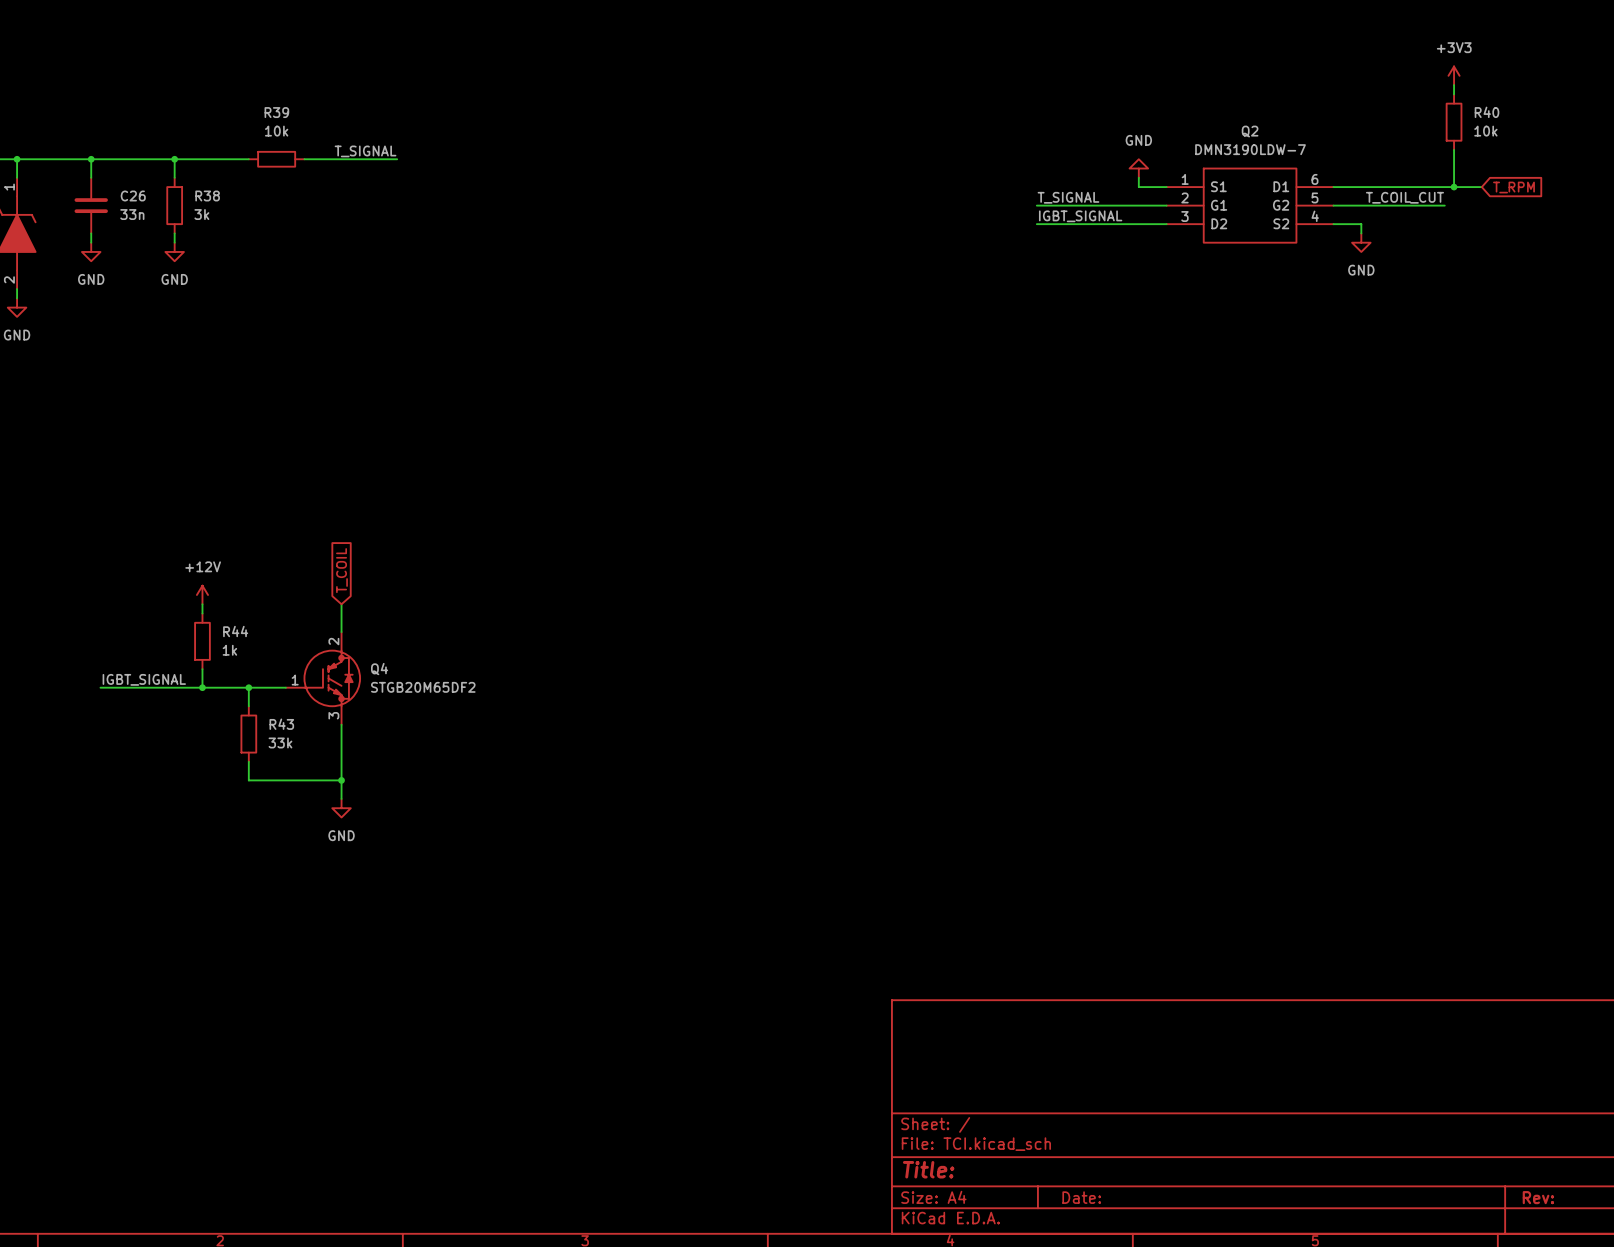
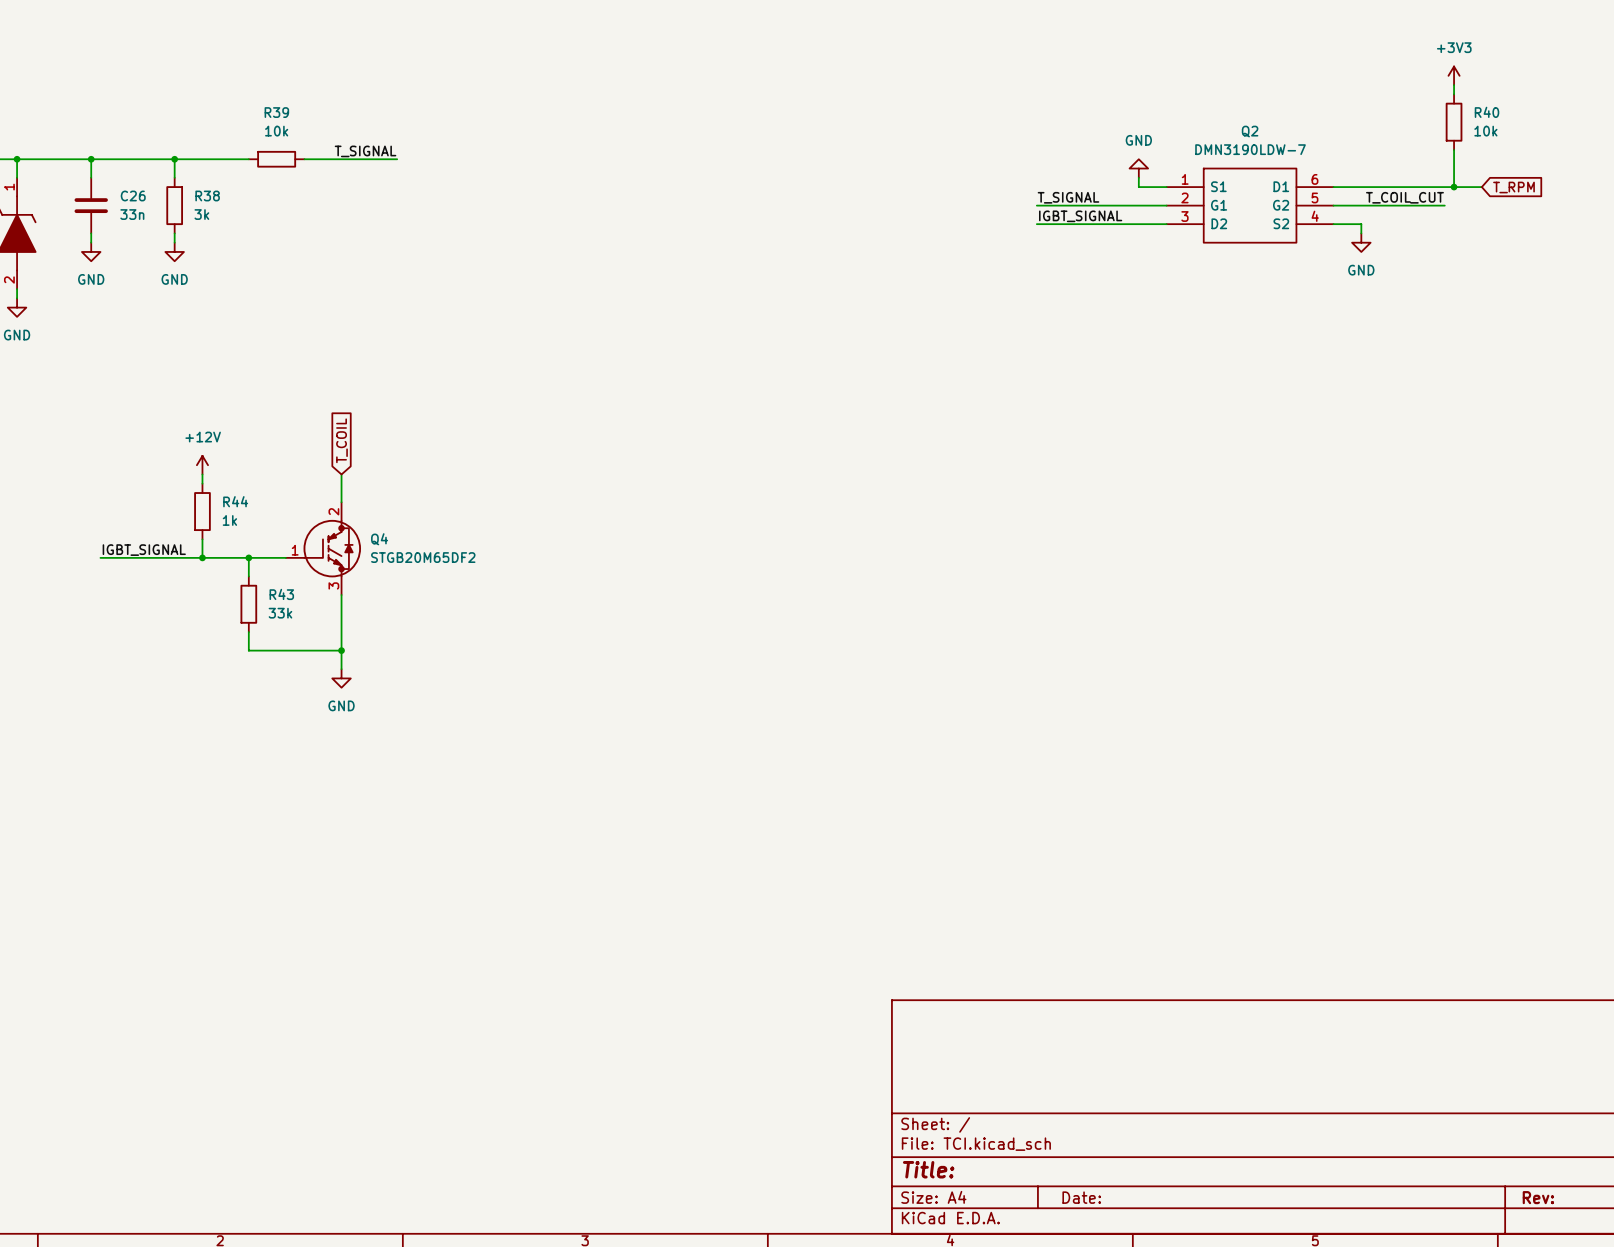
wire: none -> (341, 474) (341, 502)
junction: none -> (202, 557)
junction: none -> (248, 557)
global label position: T_COIL (341, 570) -> T_COIL (341, 440)
power symbol position: +12V (202, 594) -> +12V (202, 465)
wire: none -> (341, 594) (341, 604)
wire: (202, 604) (202, 613) -> (202, 474) (202, 483)
R44 position: (202, 641) -> (202, 511)
junction: none -> (341, 650)
wire: (202, 669) (202, 687) -> (202, 539) (202, 557)
Q4 position: (323, 678) -> (323, 548)
label position: IGBT_SIGNAL (144, 679) -> IGBT_SIGNAL (144, 550)
wire: (100, 687) (285, 687) -> (100, 557) (285, 557)
junction: (202, 687) -> none
wire: (248, 687) (248, 706) -> (248, 557) (248, 576)
junction: (248, 687) -> none
wire: (341, 724) (341, 798) -> none
R43 position: (248, 734) -> (248, 604)
wire: (248, 761) (248, 780) (341, 780) -> (248, 632) (248, 650) (341, 650)
junction: (341, 780) -> none
power symbol position: GND (341, 808) -> GND (341, 678)

